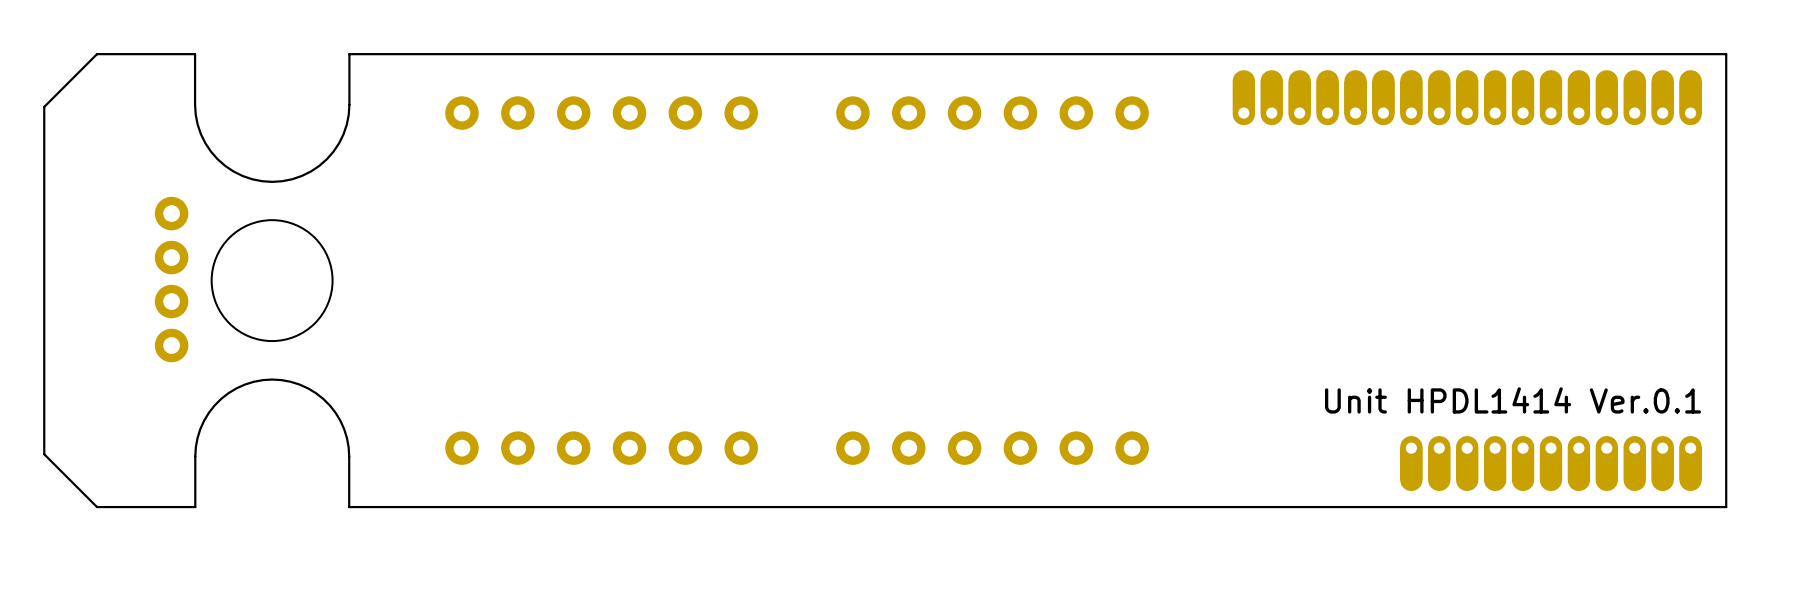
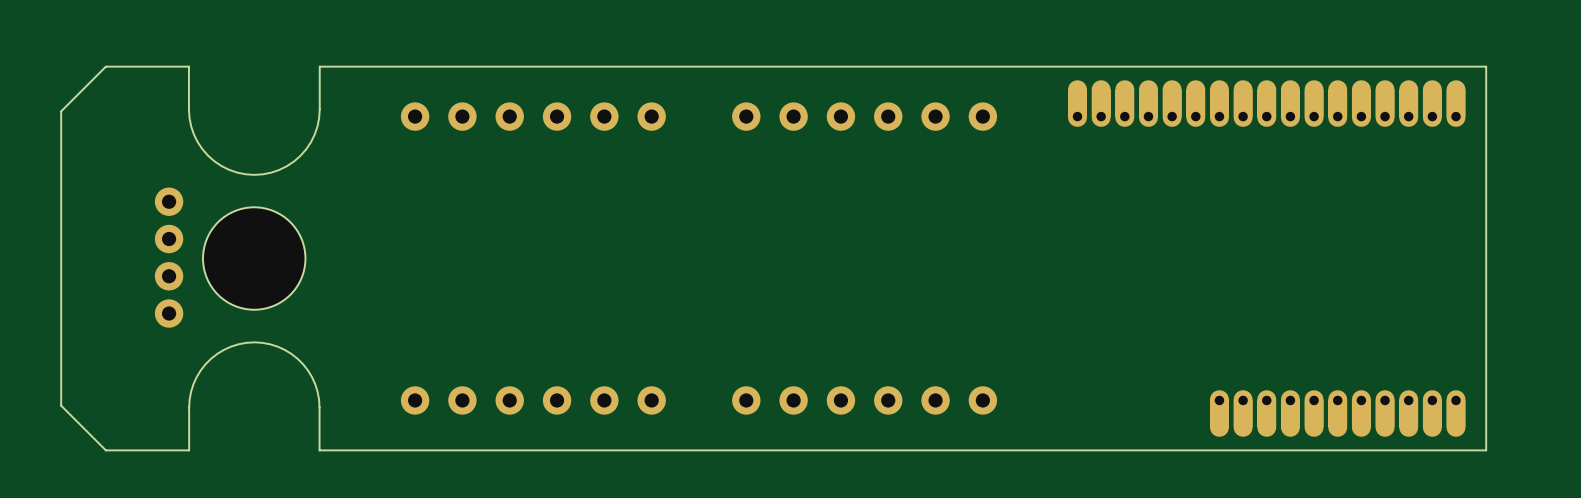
text: Unit HPDL1414 Ver.0.1 (1512, 400) -> none

